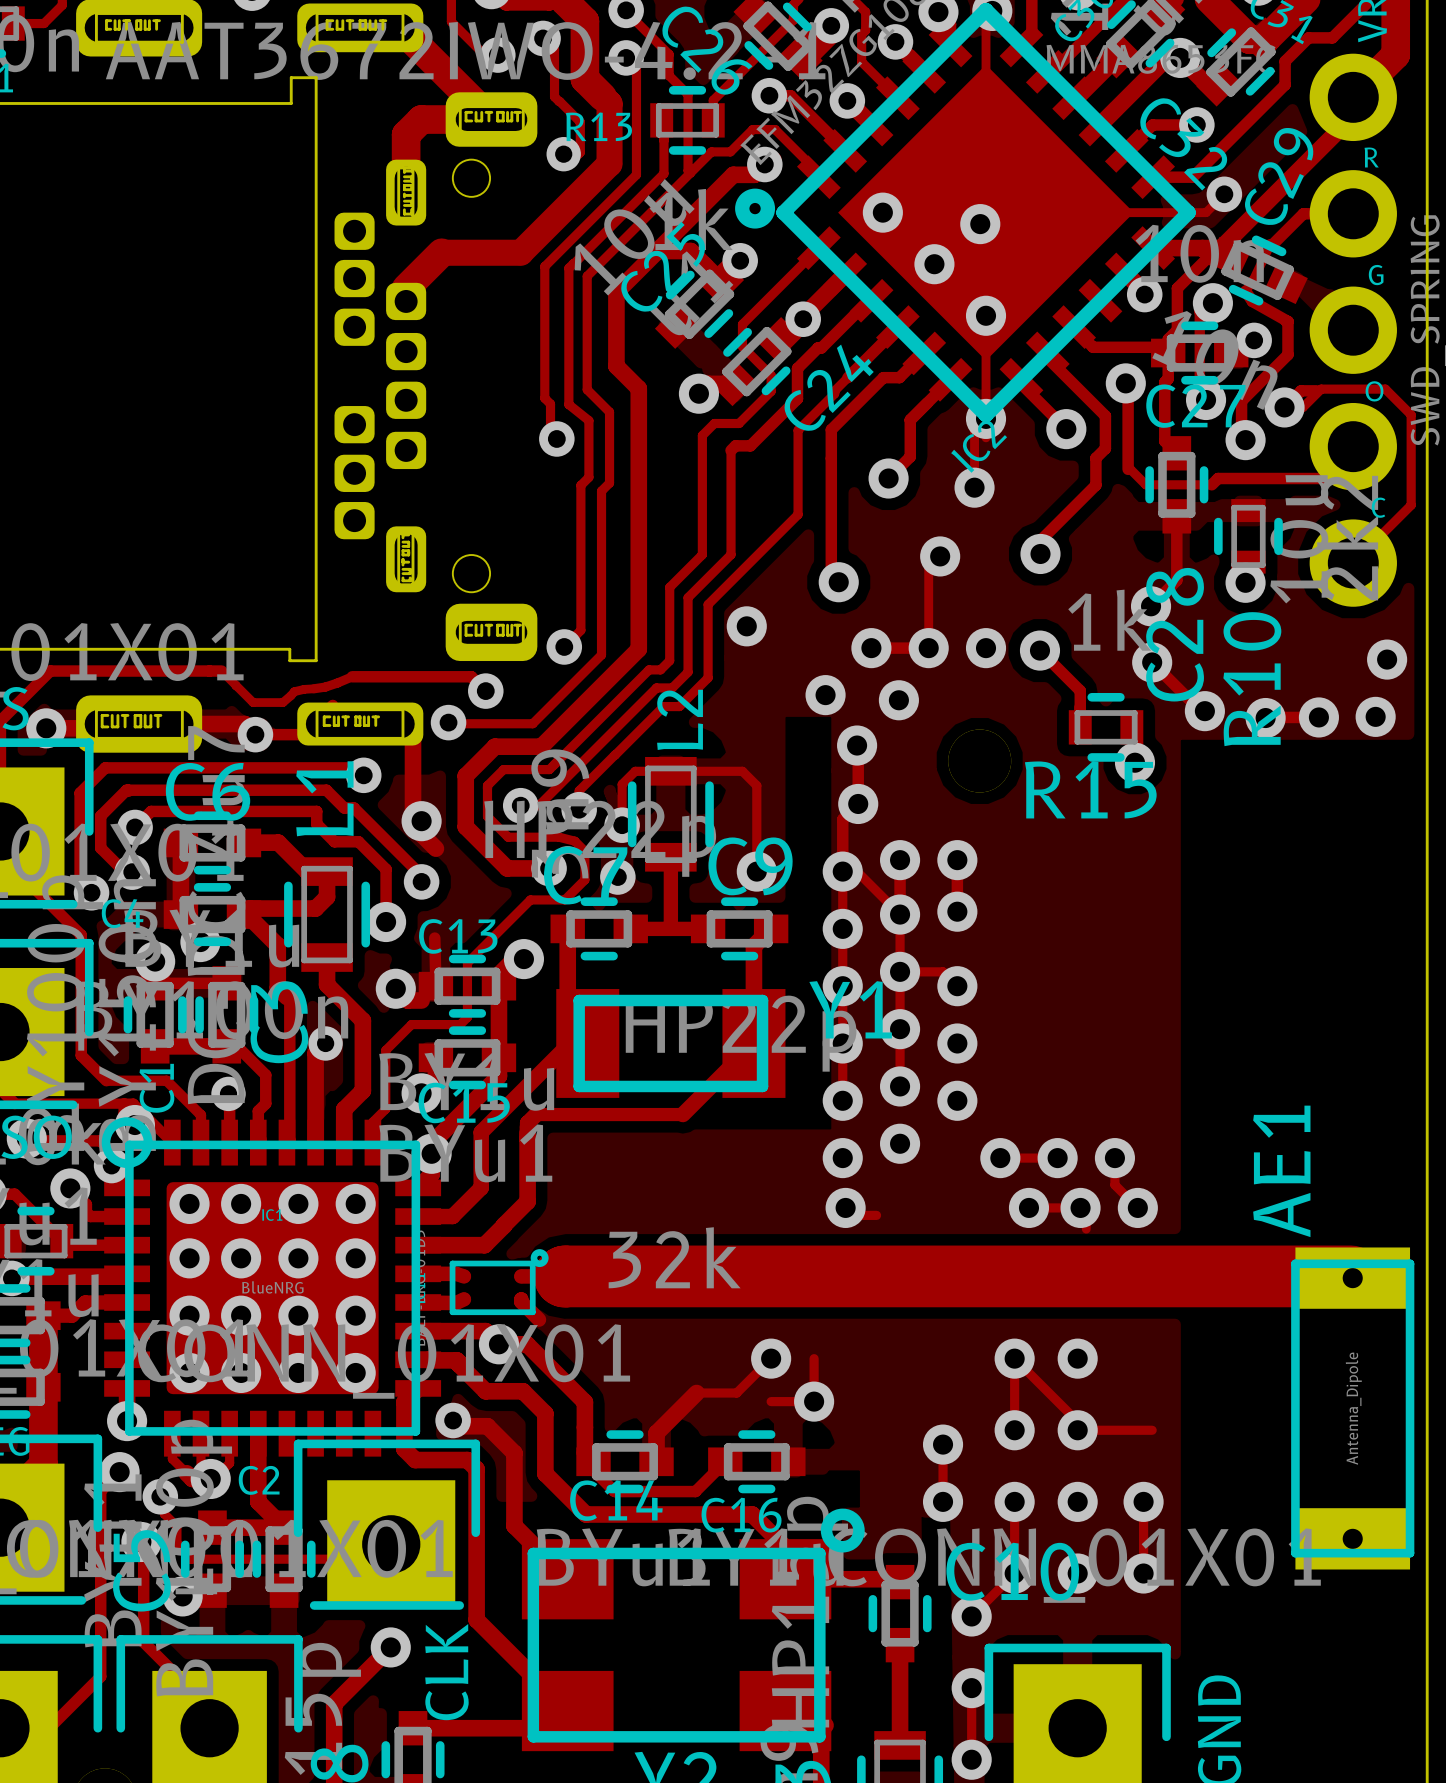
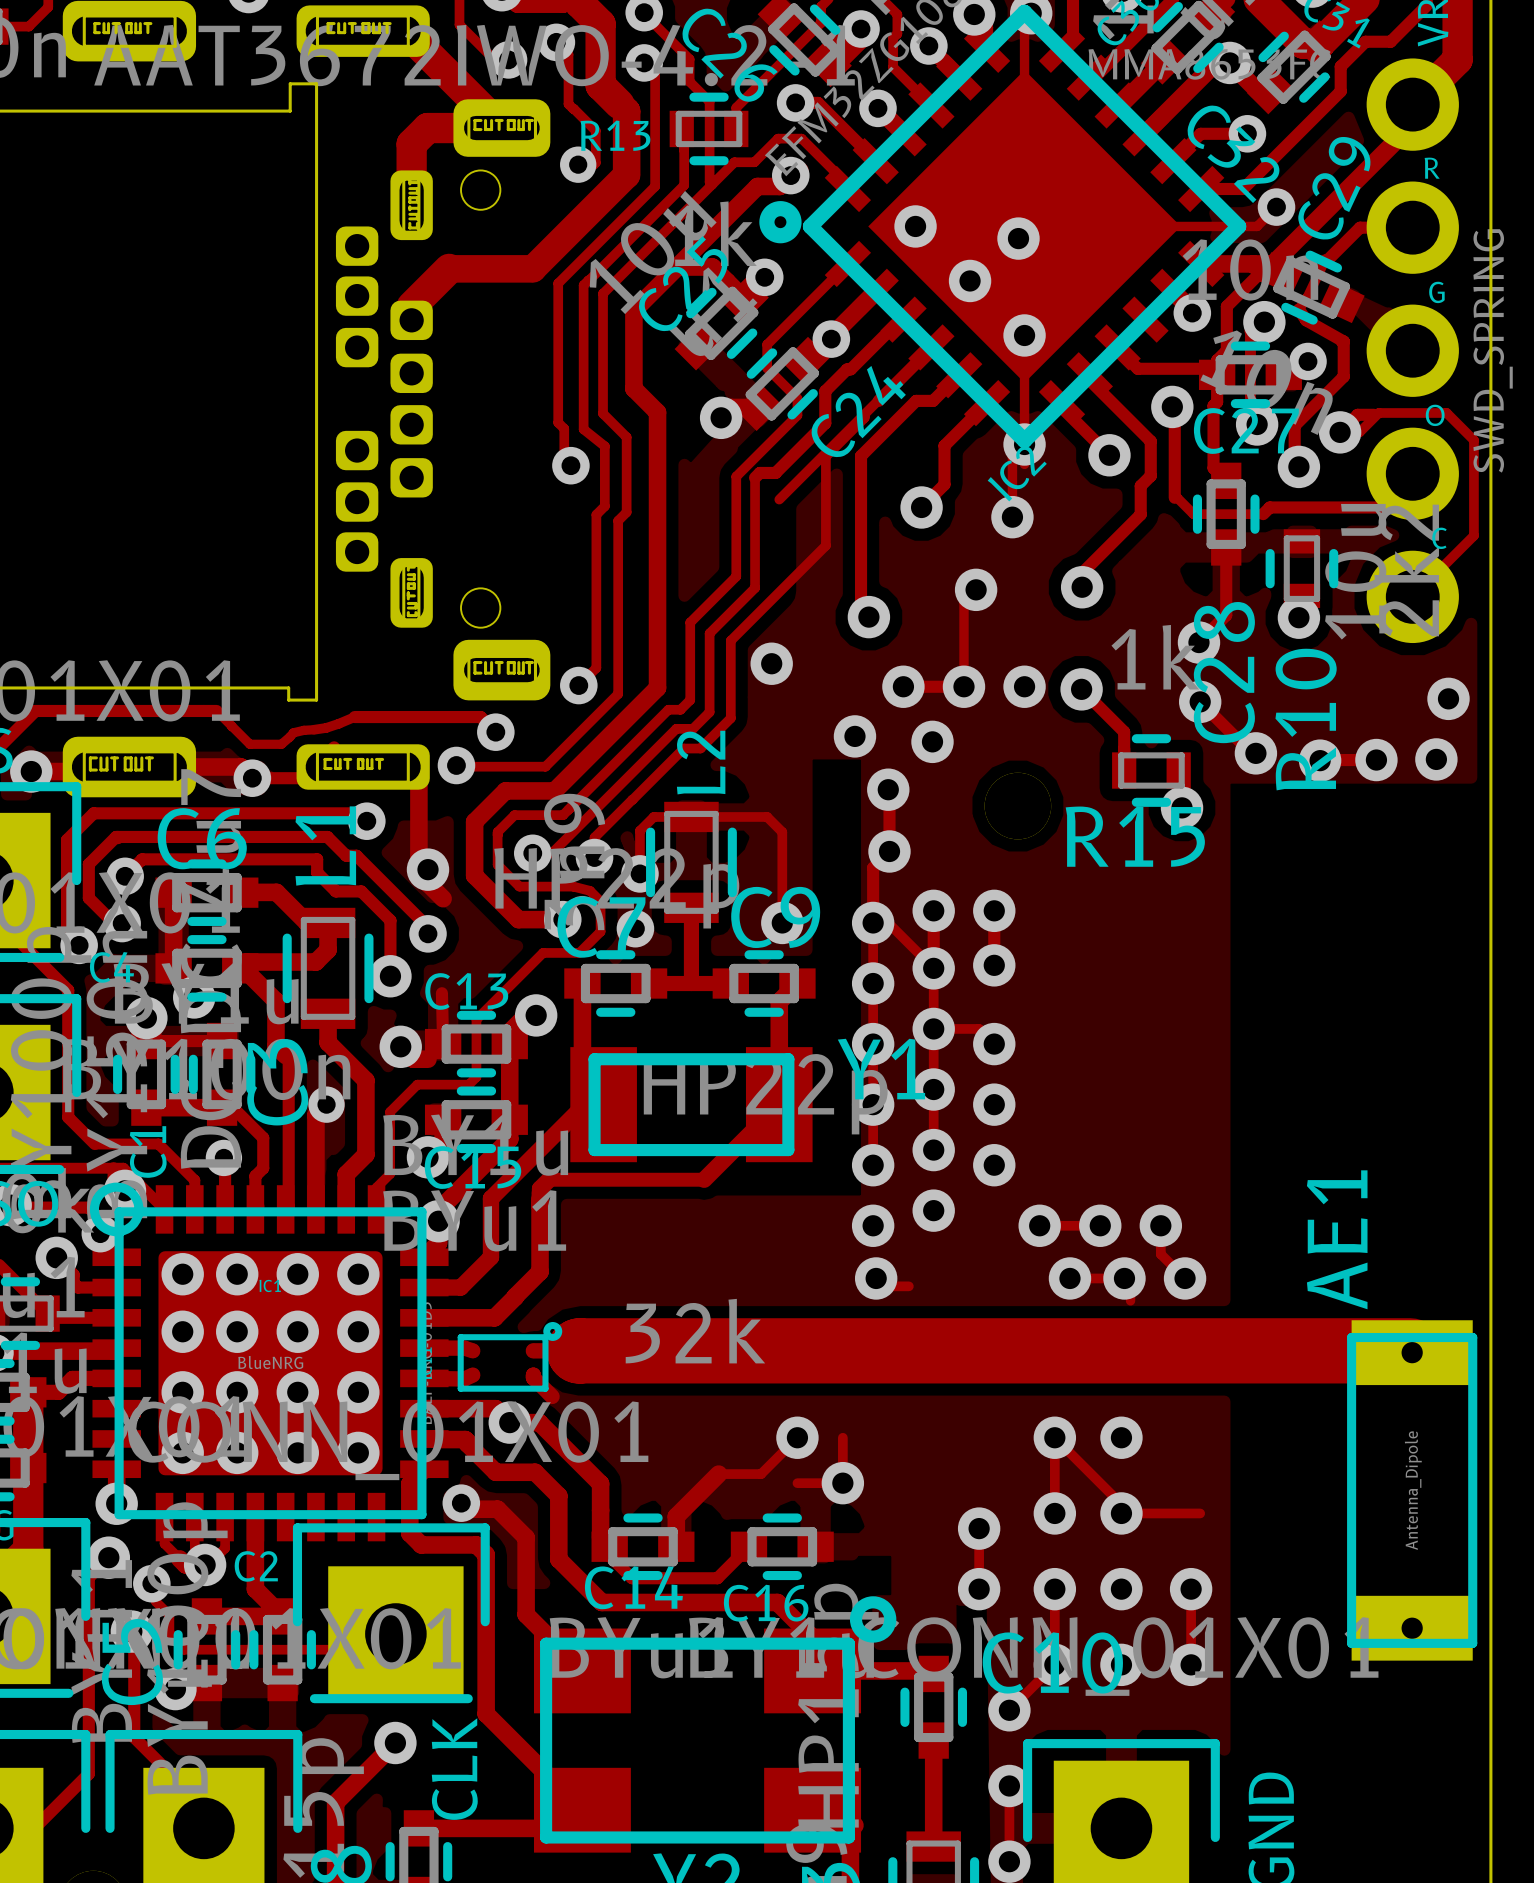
track: (739, 423) (714, 423) (702, 435) (702, 554) -> (763, 449) (736, 476) (736, 576) (724, 588)

